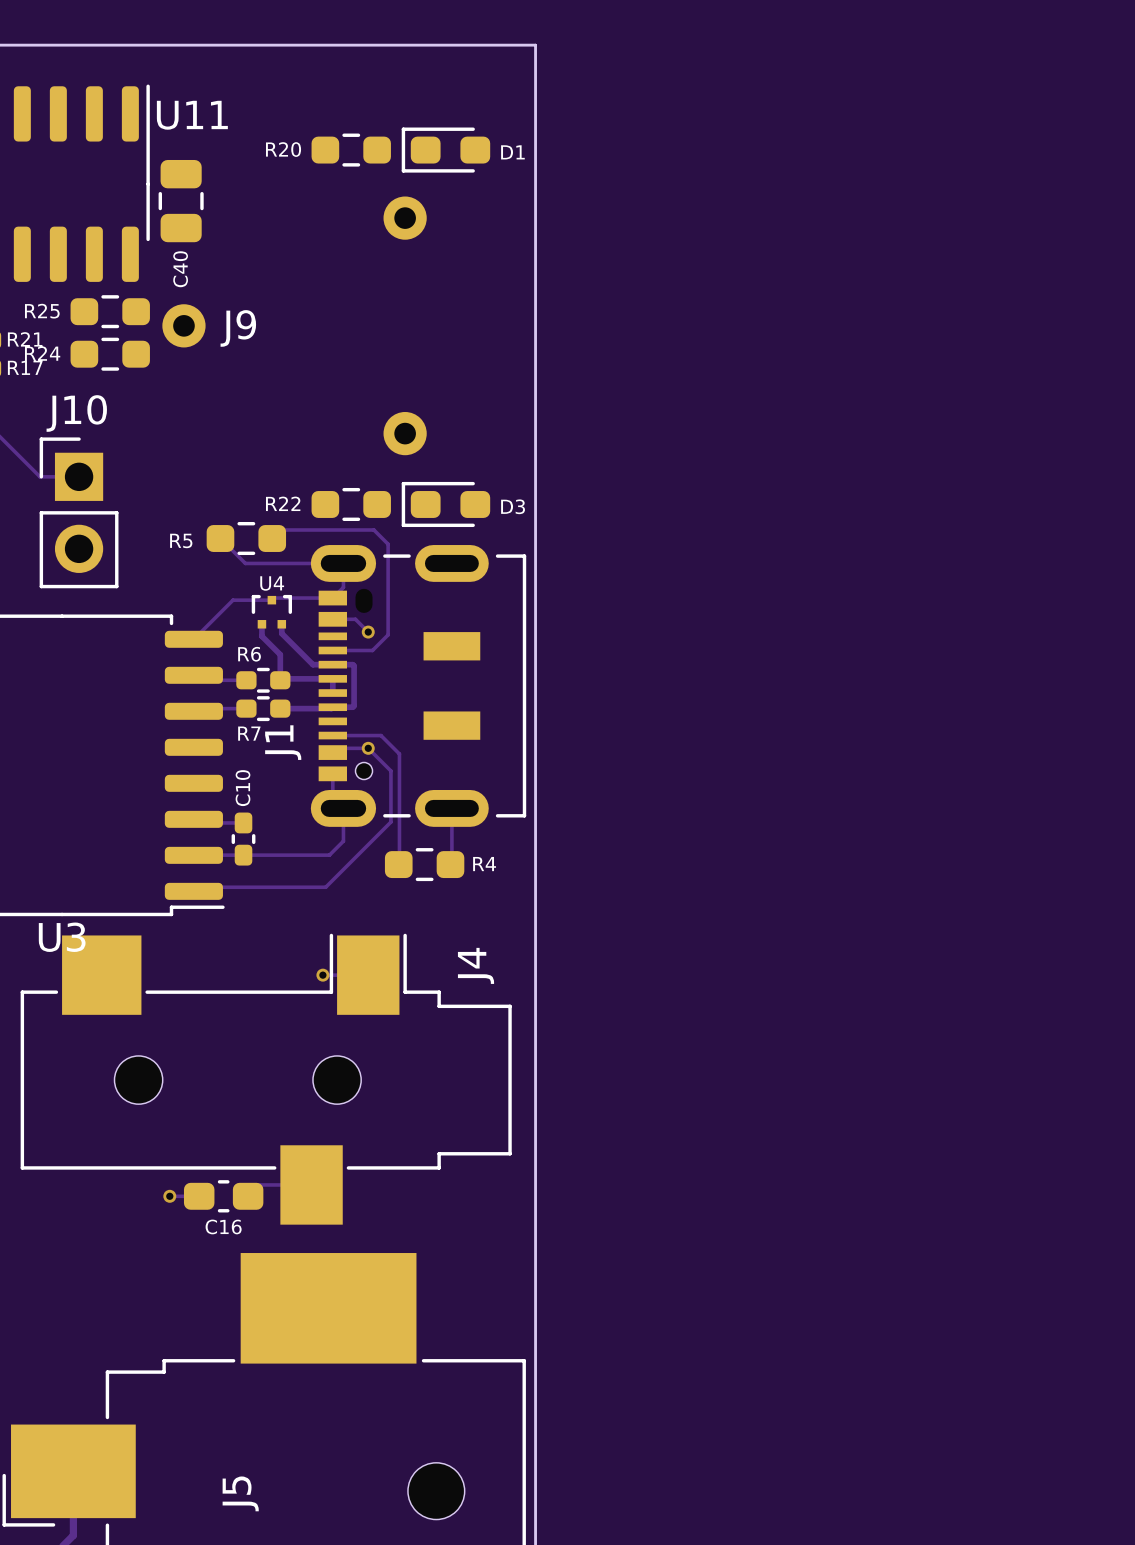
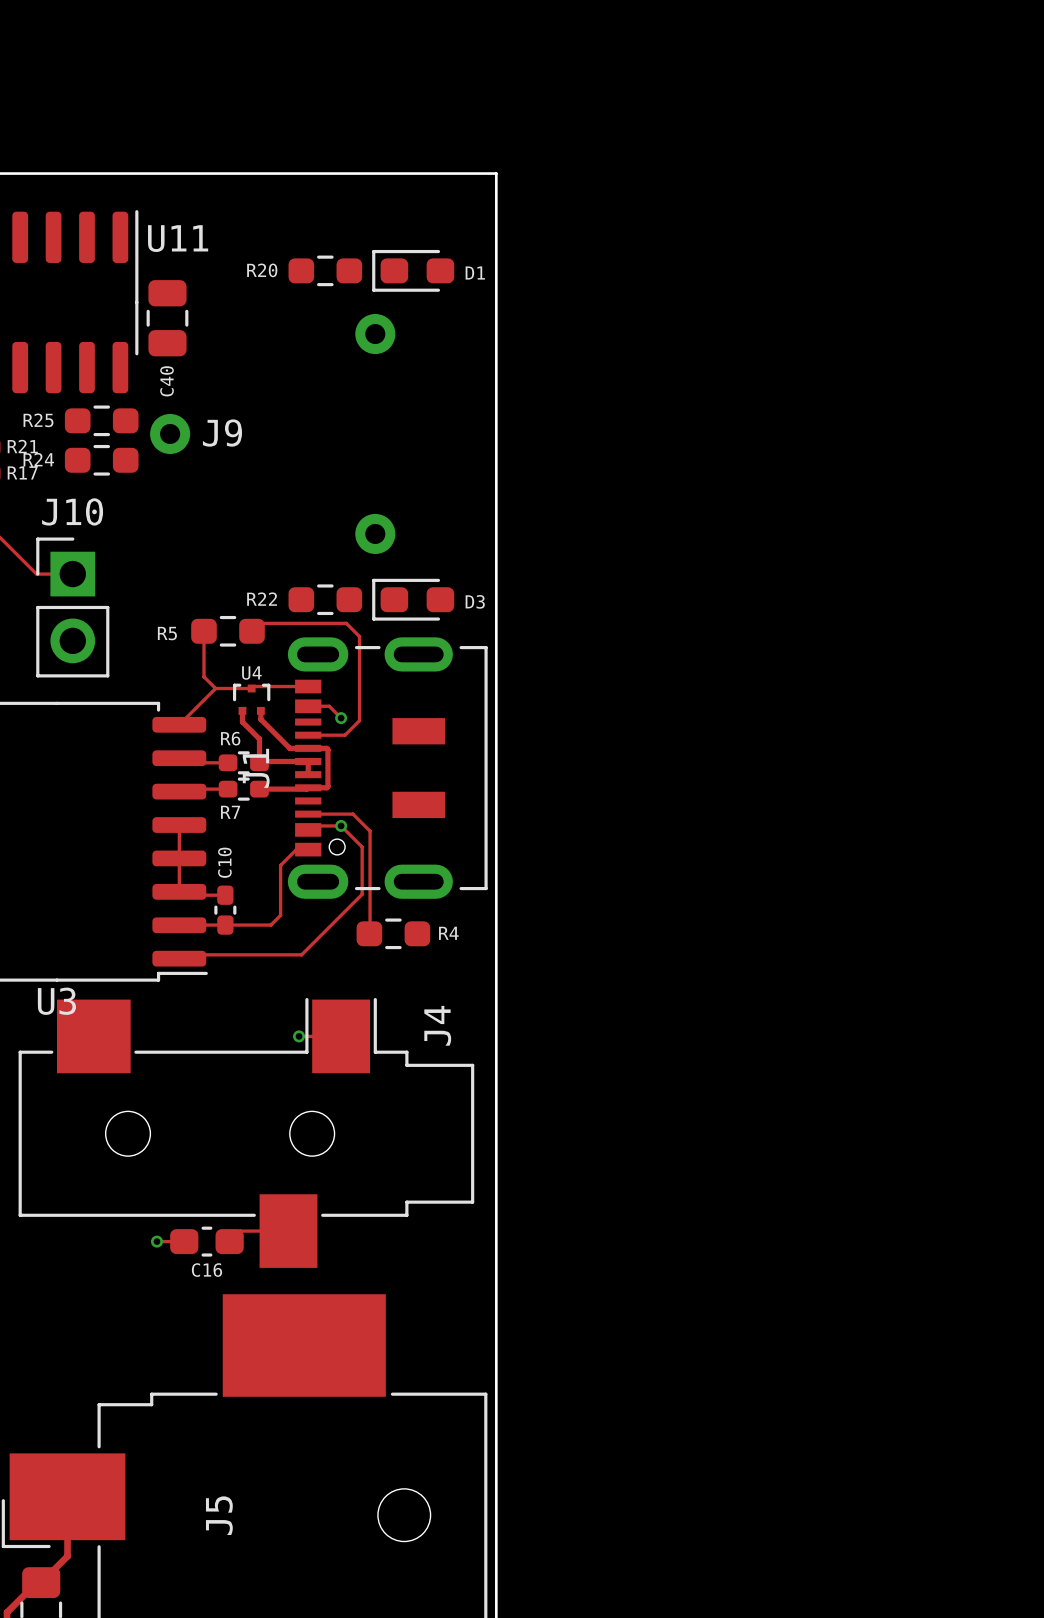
track: (220, 538) (245, 563) (343, 563) (343, 587) (332, 598) -> (203, 631) (203, 676) (215, 688)
J1 name position: J1 (283, 742) -> J1 (256, 768)
track: none -> (179, 825) (179, 891)
track: (332, 773) (332, 797) -> none
track: (343, 808) (343, 841) (329, 855) (292, 855) -> (308, 849) (296, 849) (280, 865) (280, 915) (270, 925)
track: (451, 808) (451, 863) -> none

